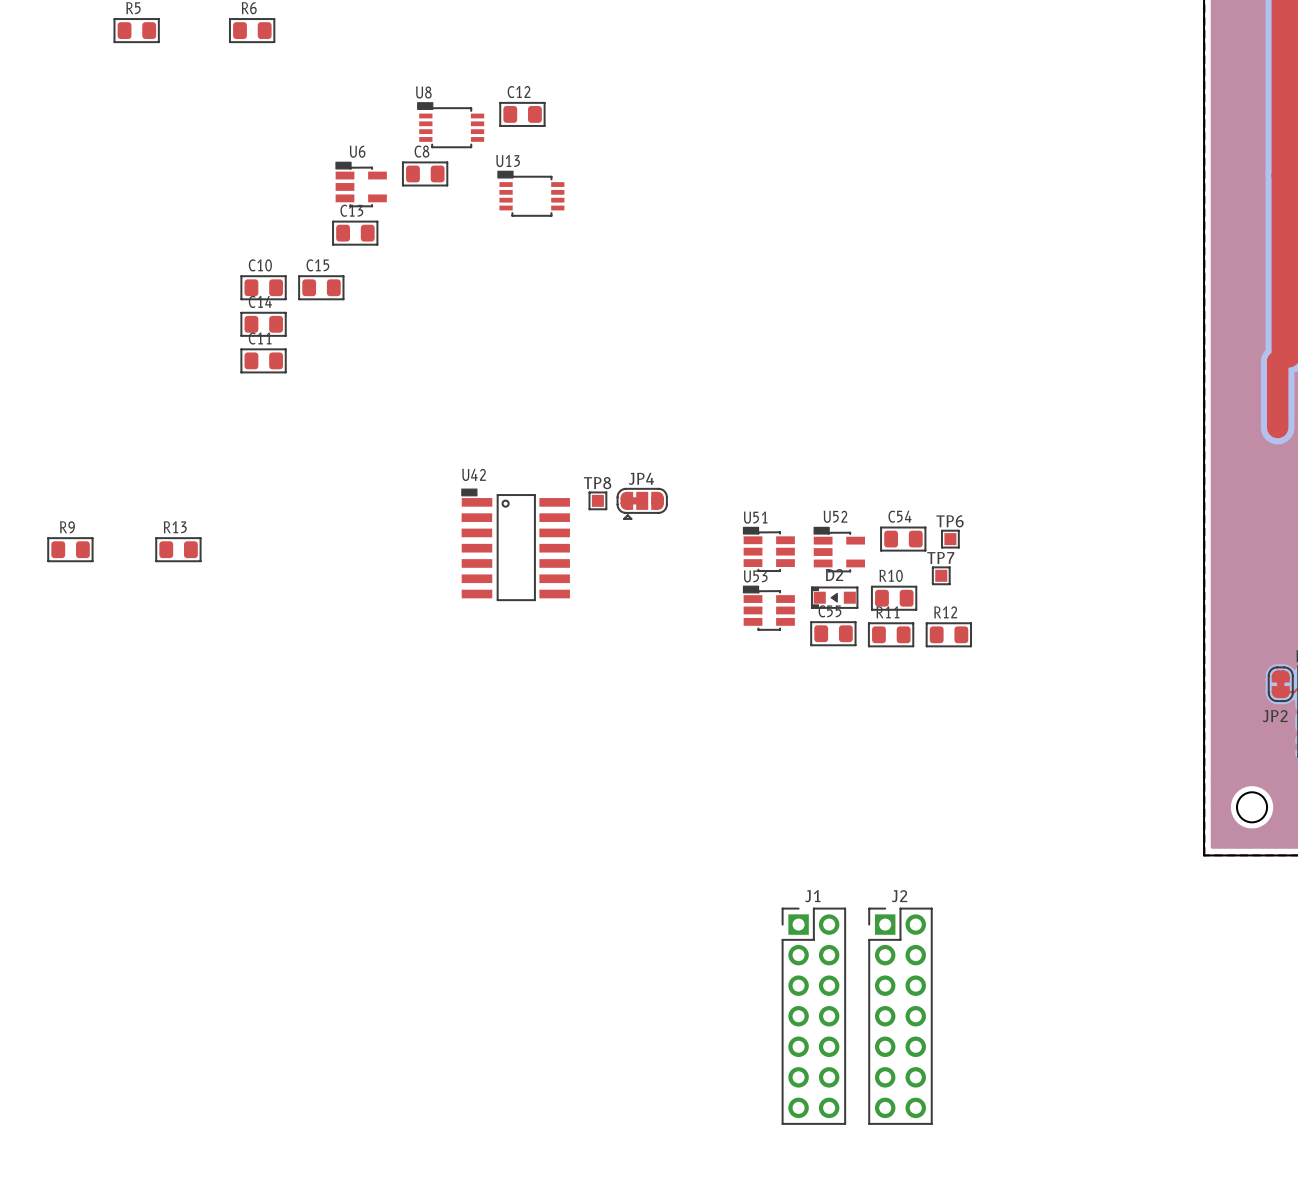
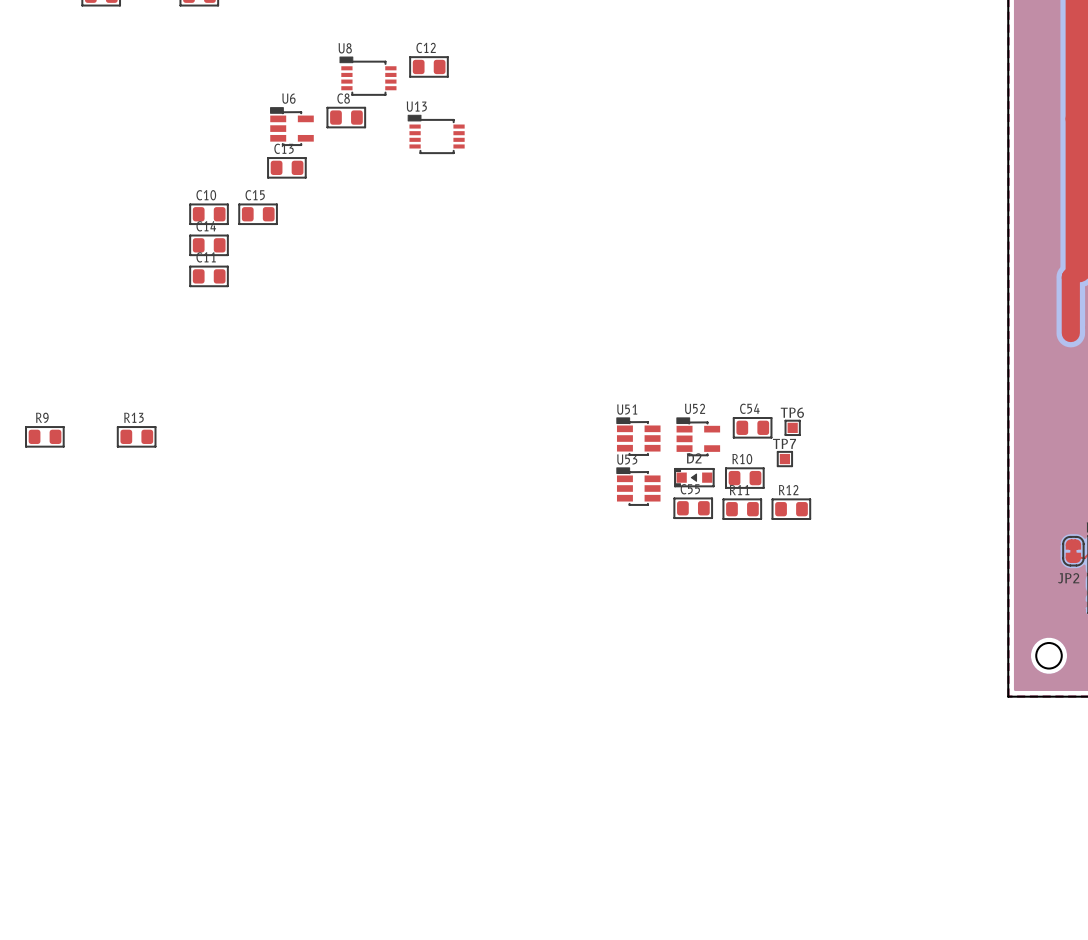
TP8: (597, 500) -> none
JP4: (642, 503) -> none
U42: (515, 544) -> none
J1: (813, 1016) -> none
J2: (900, 1016) -> none

